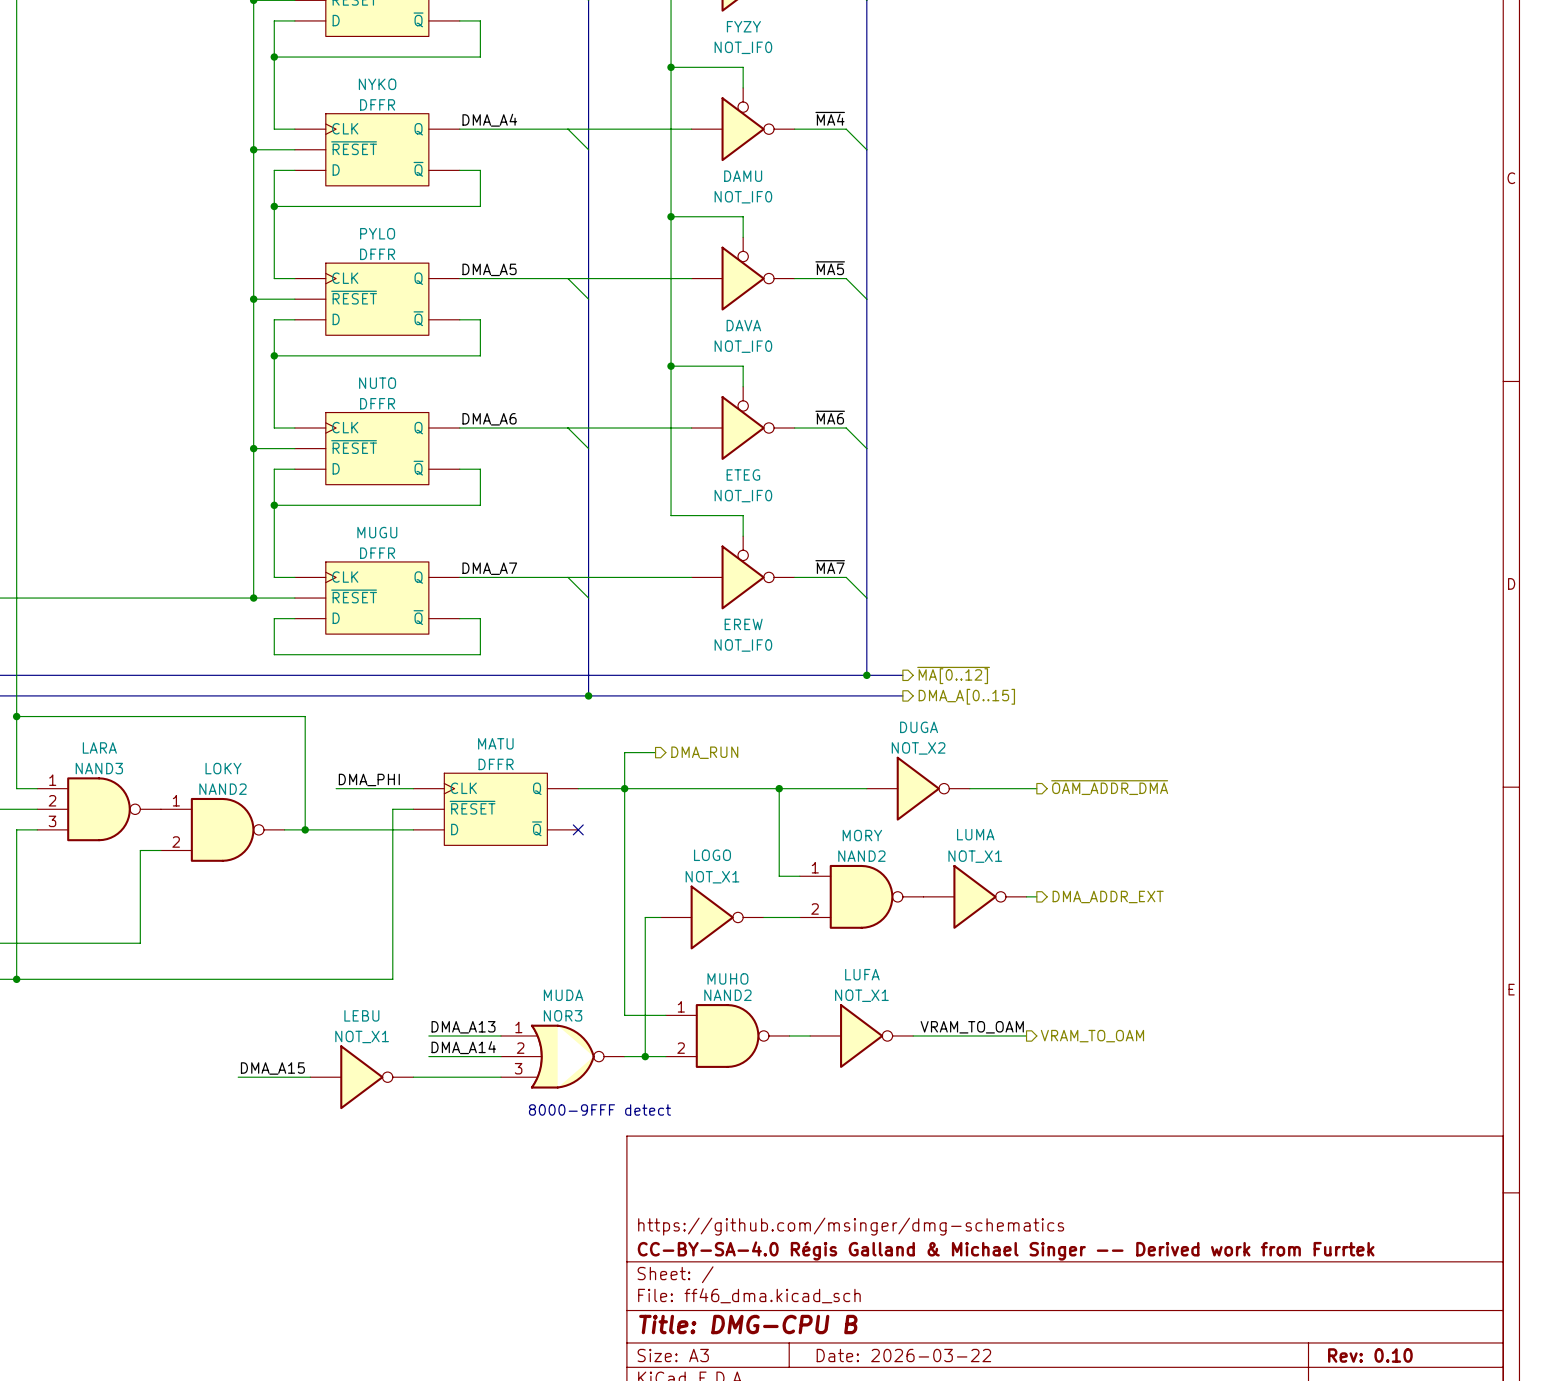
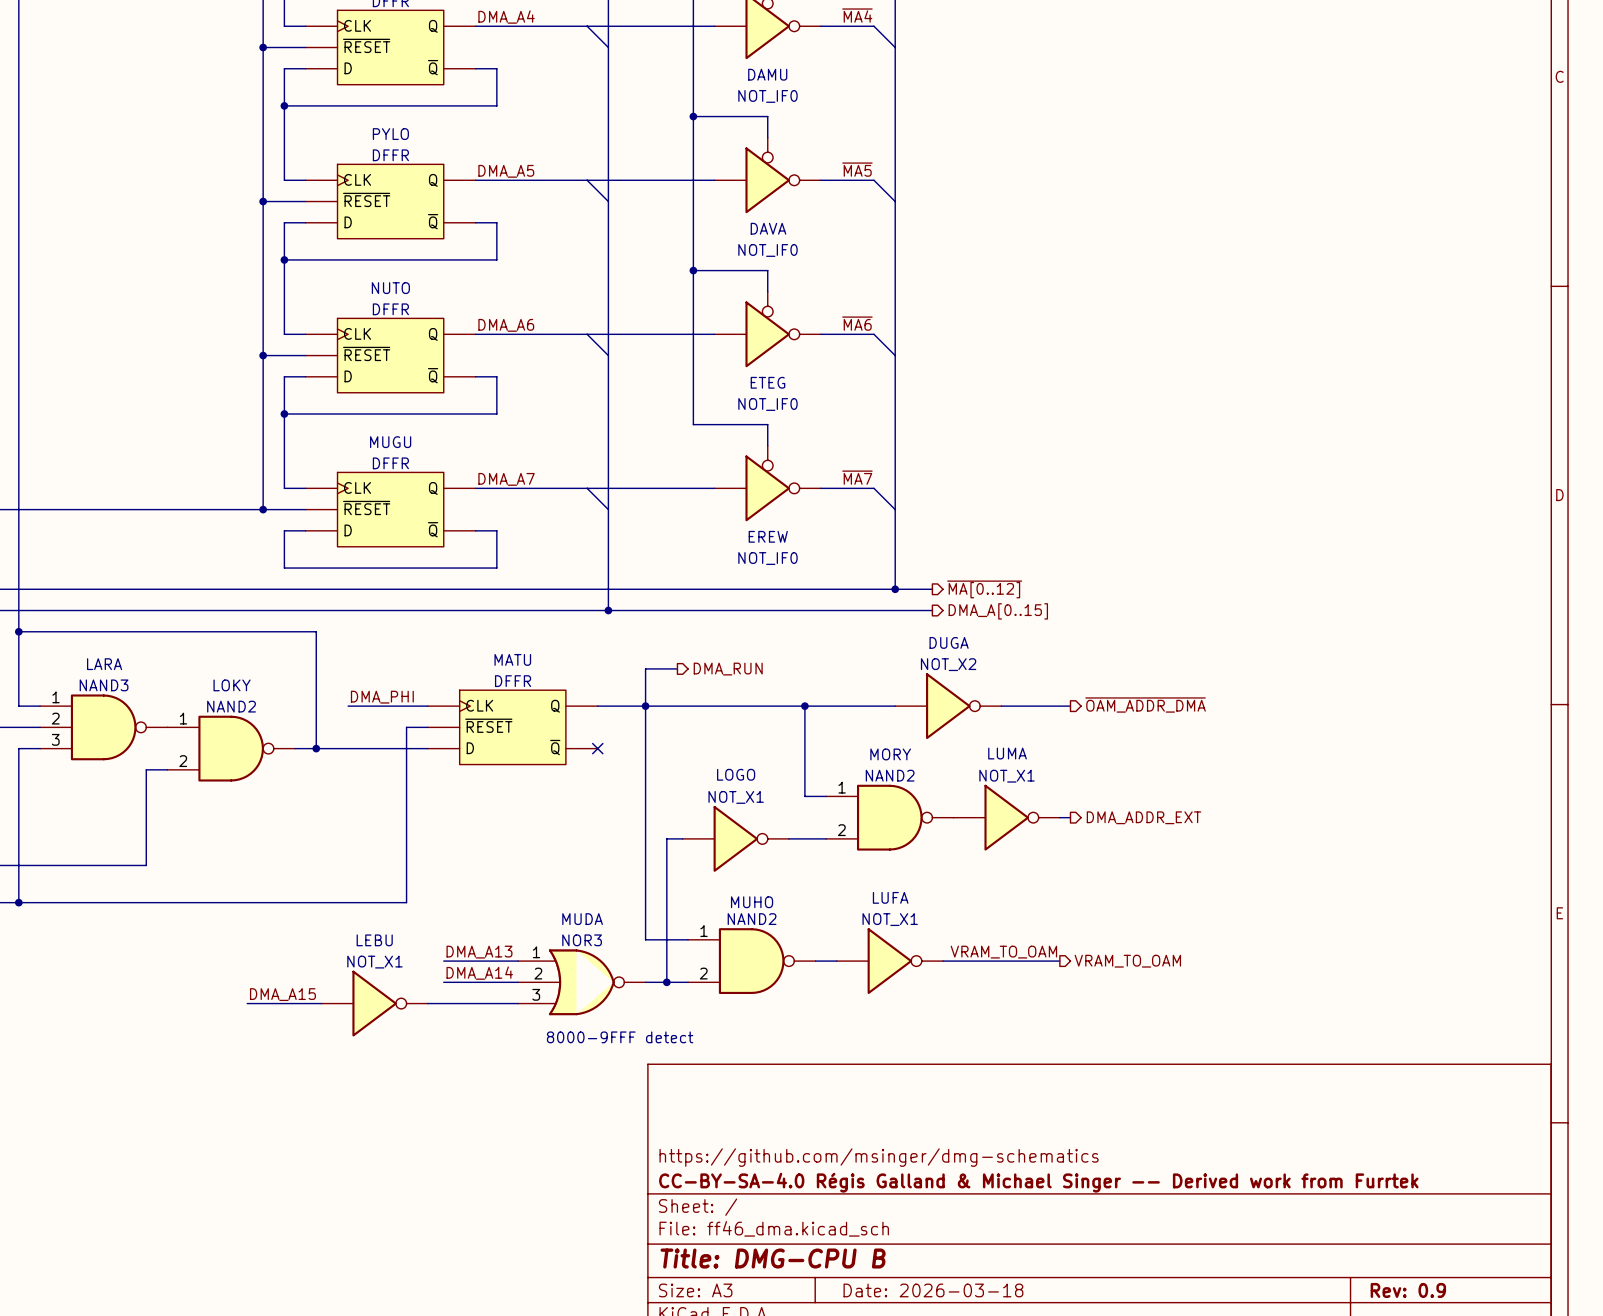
title block: Date: 2026-03-22 (903, 1355) -> Date: 2026-03-18 (933, 1290)
title block: Rev: 0.10 (1370, 1355) -> Rev: 0.9 (1408, 1290)

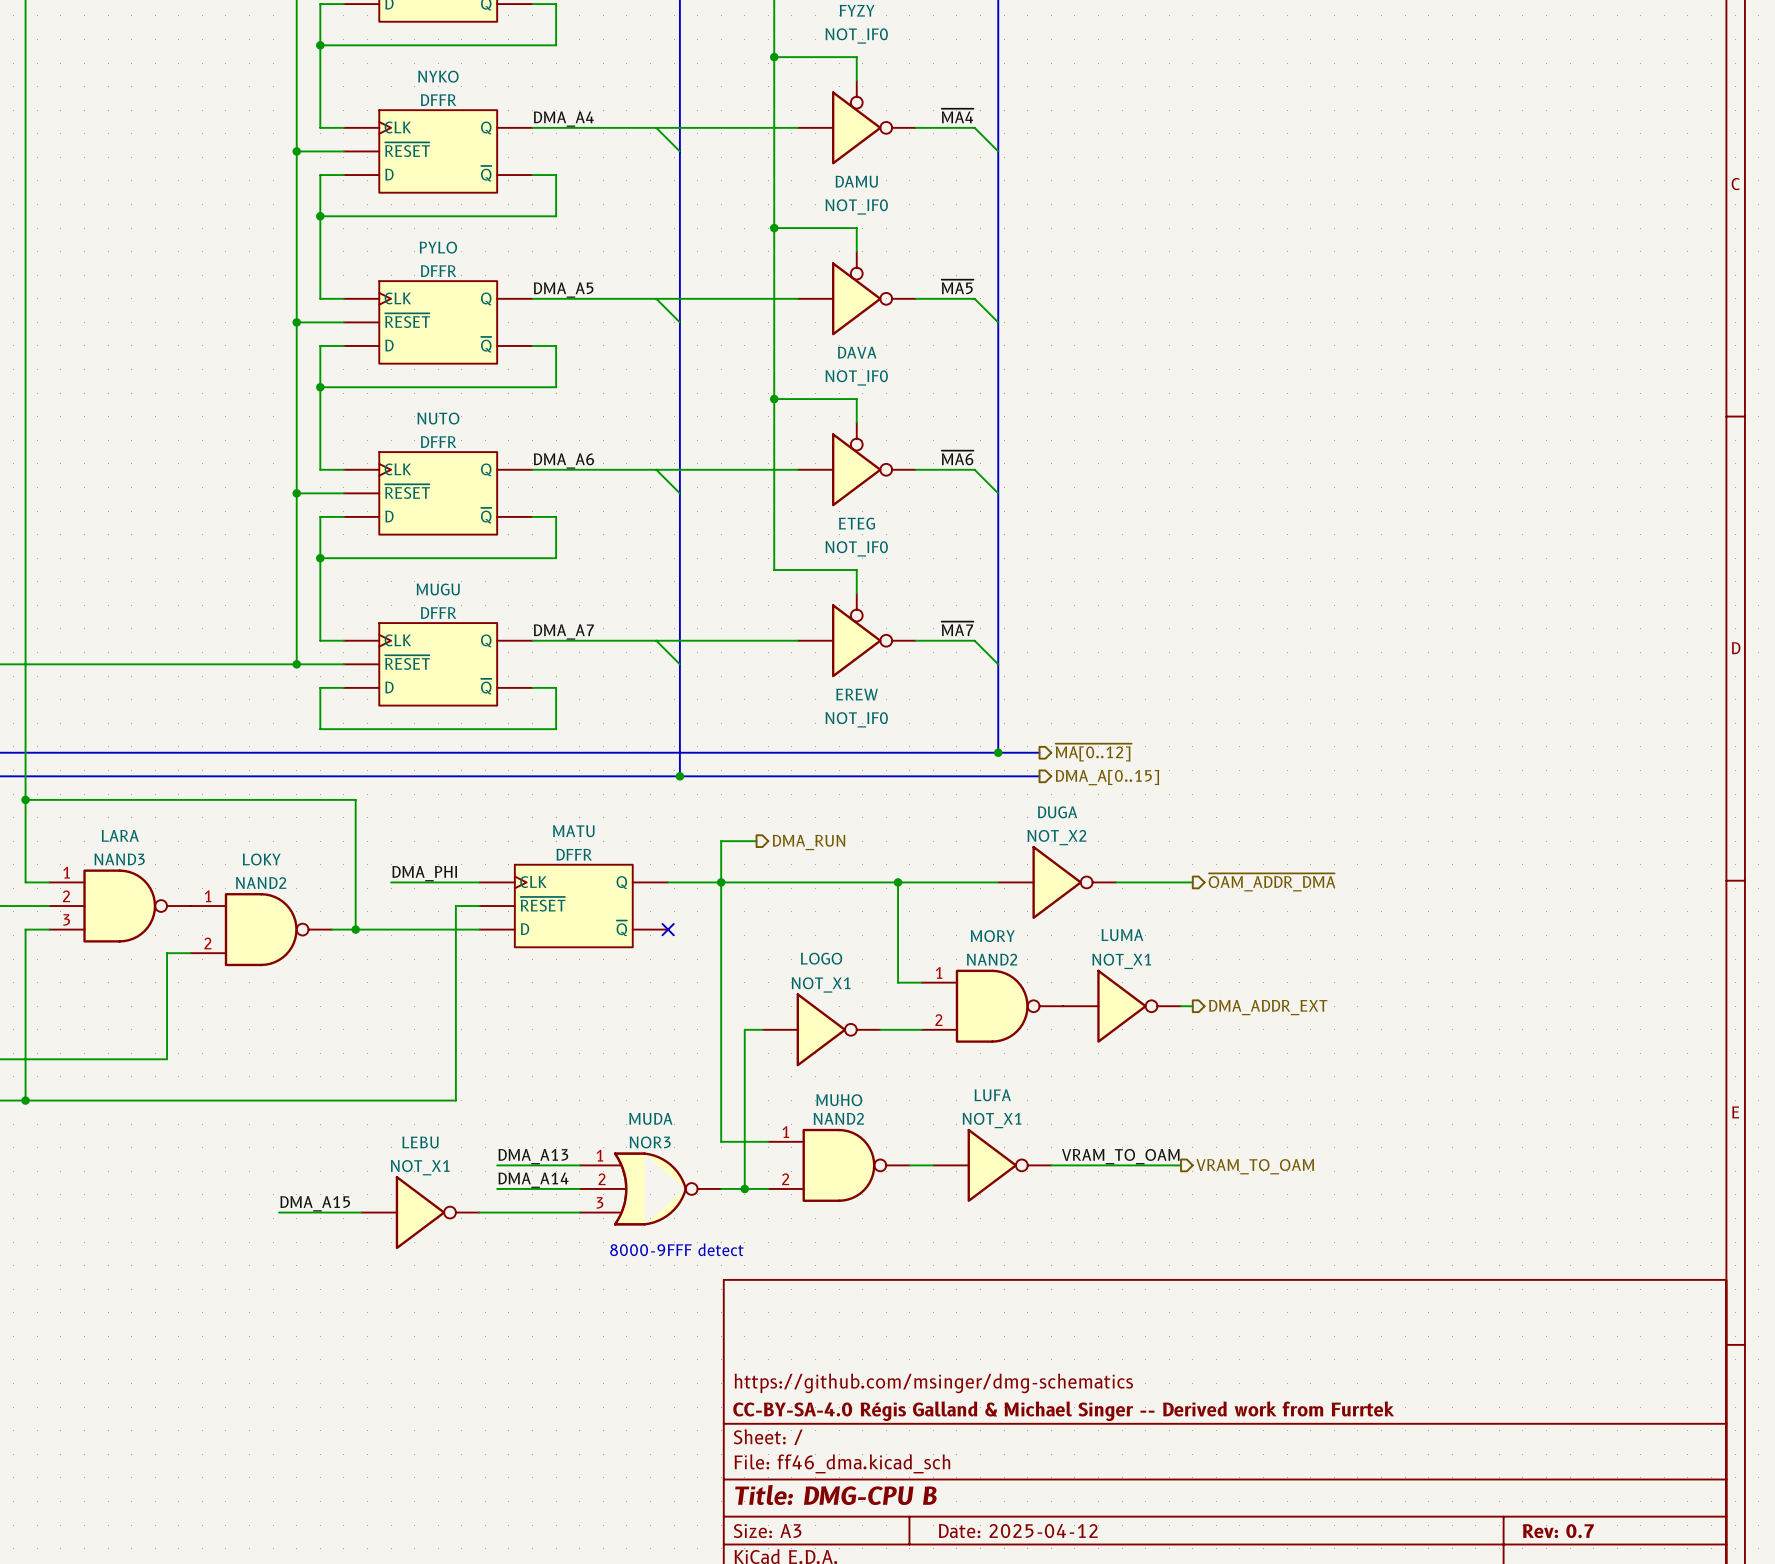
title block: Date: 2026-03-18 (933, 1290) -> Date: 2025-04-12 (1018, 1531)
title block: Rev: 0.9 (1408, 1290) -> Rev: 0.7 (1558, 1531)

